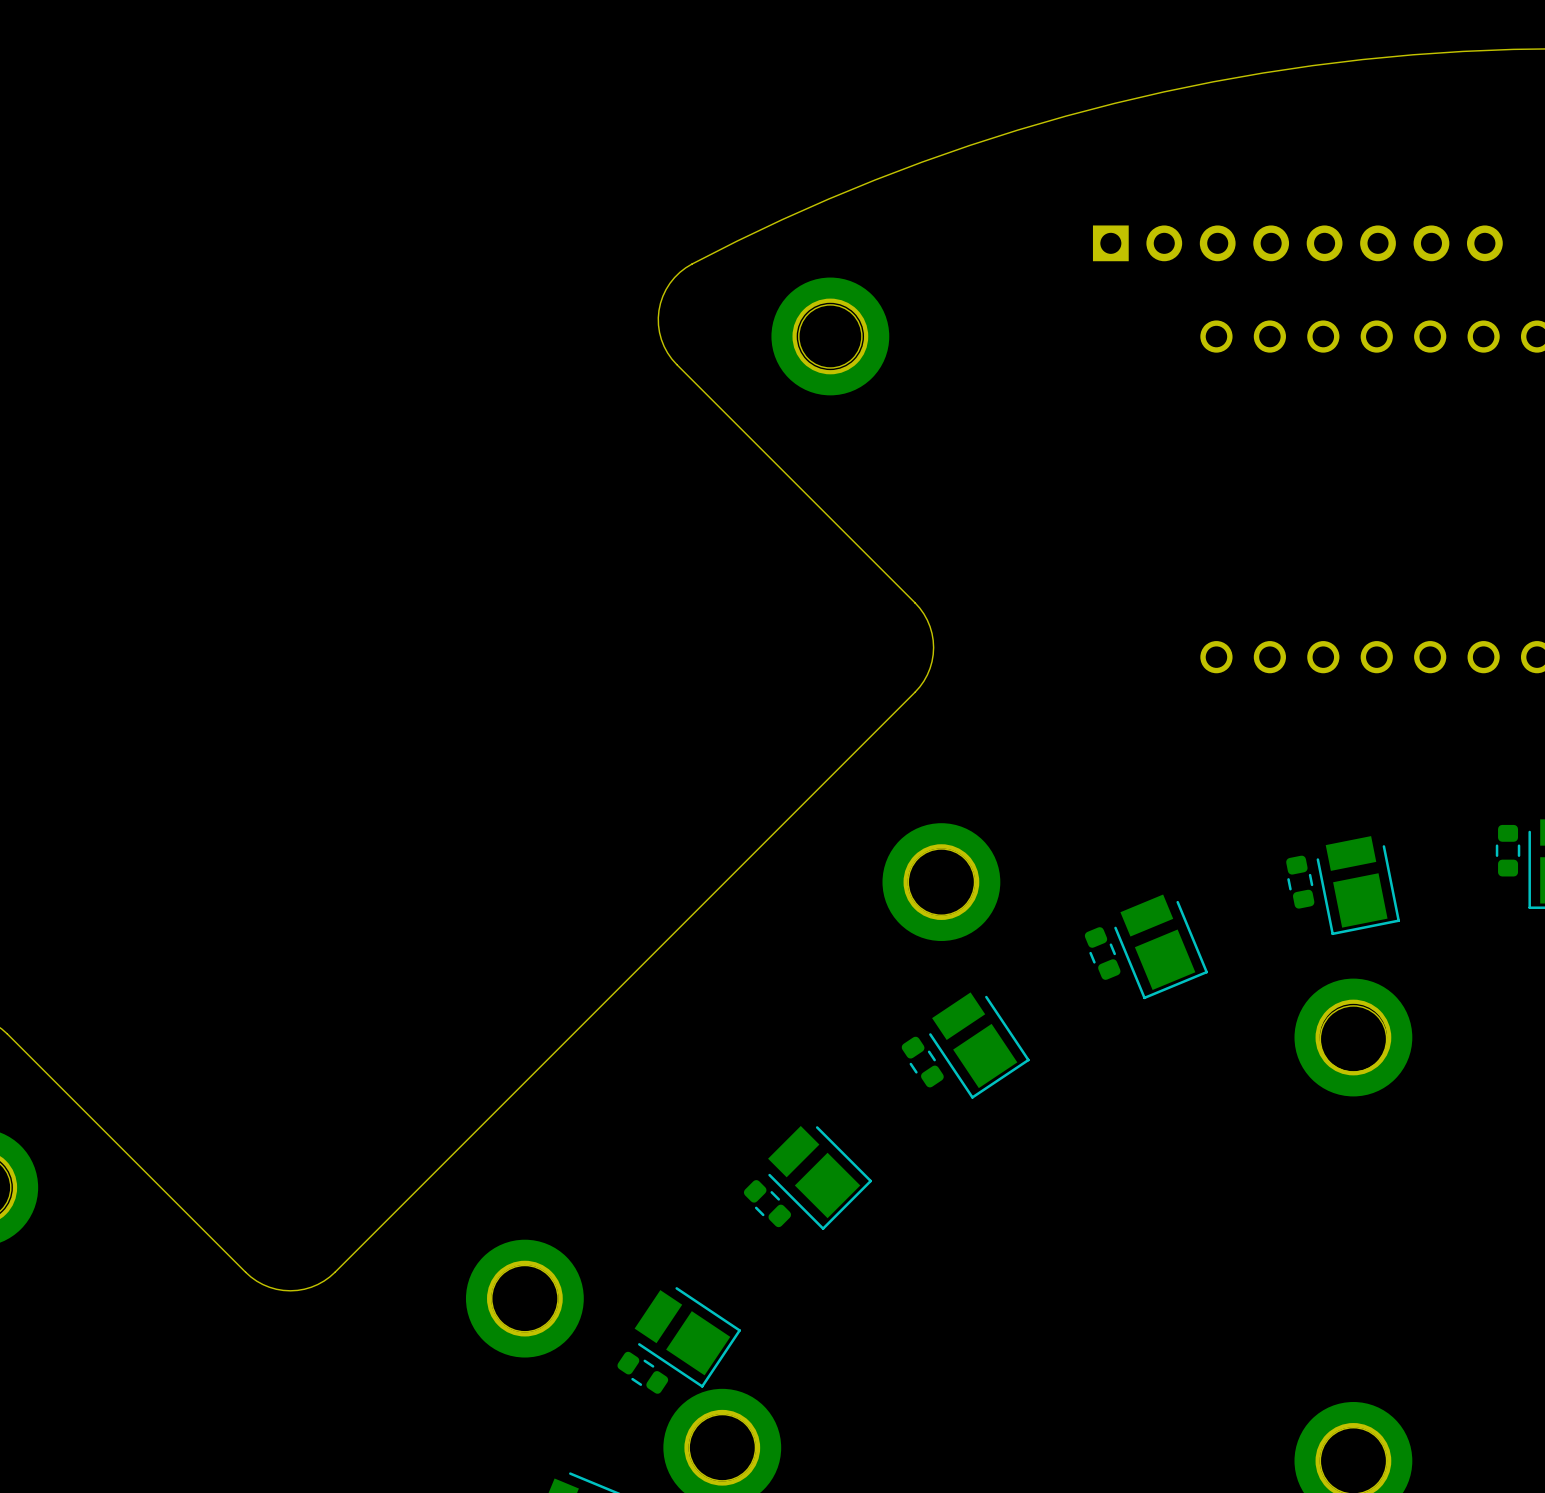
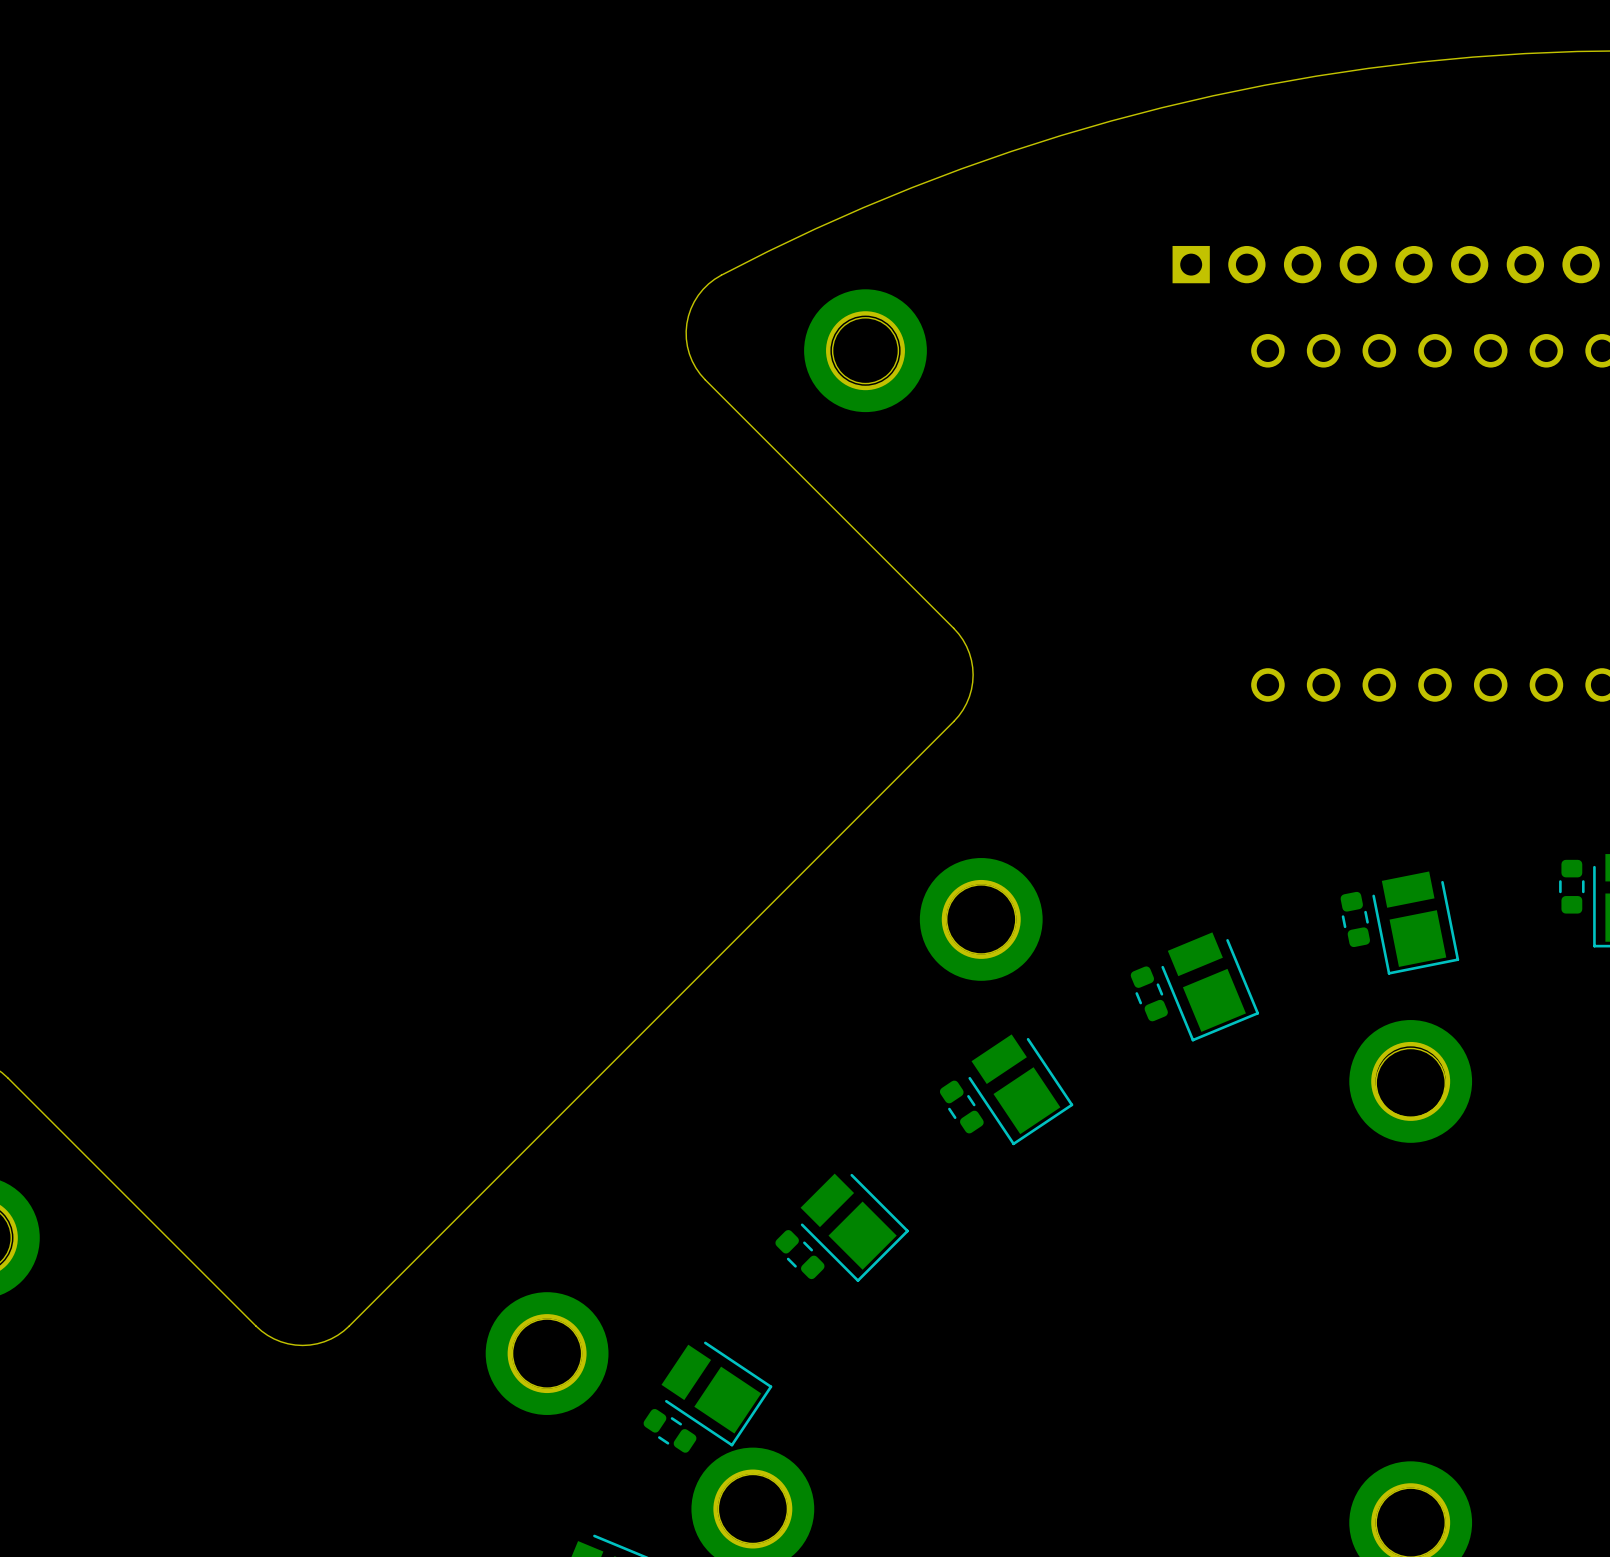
part position: (1297, 243) -> (1386, 264)

